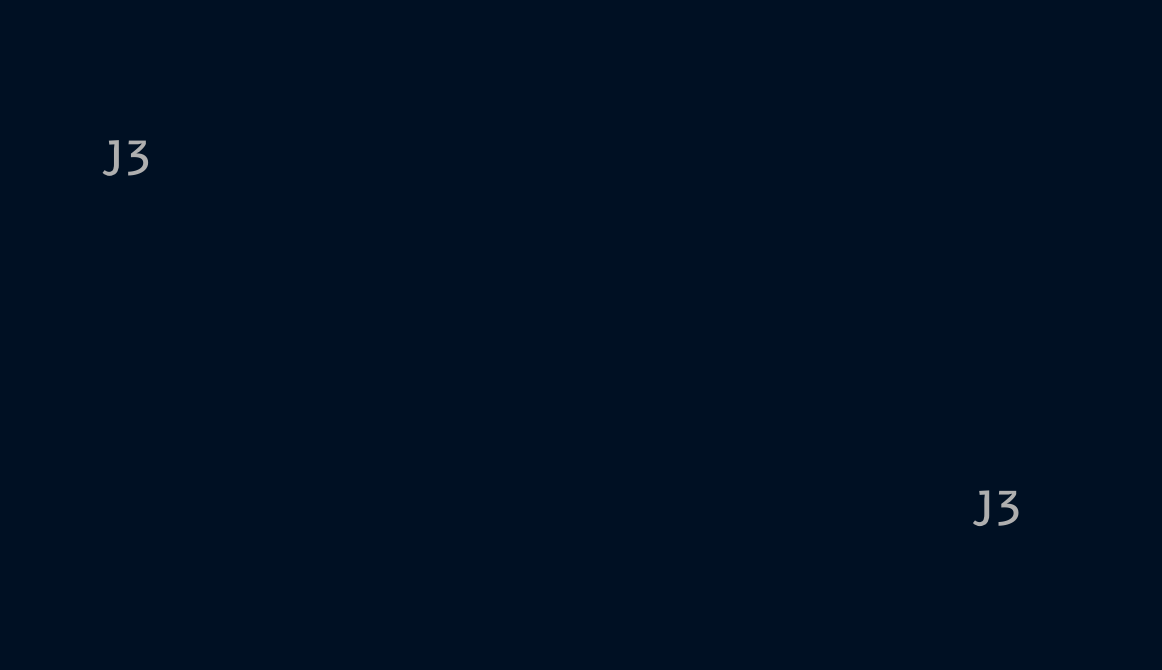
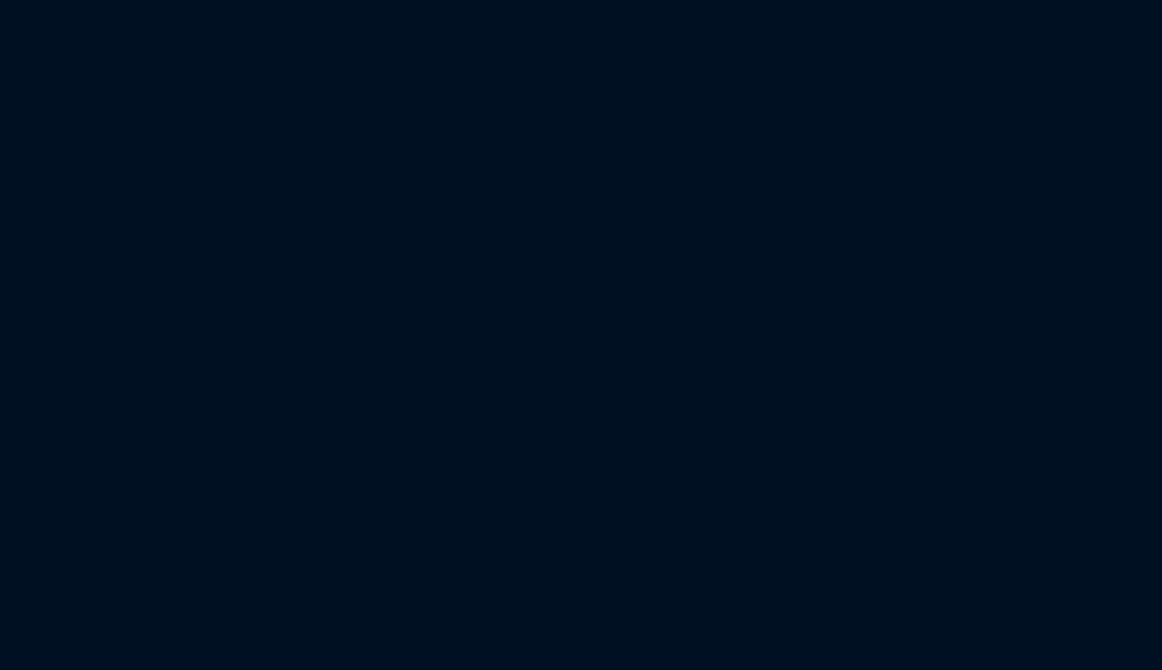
text: J3 (125, 157) -> none
text: J3 (995, 508) -> none

